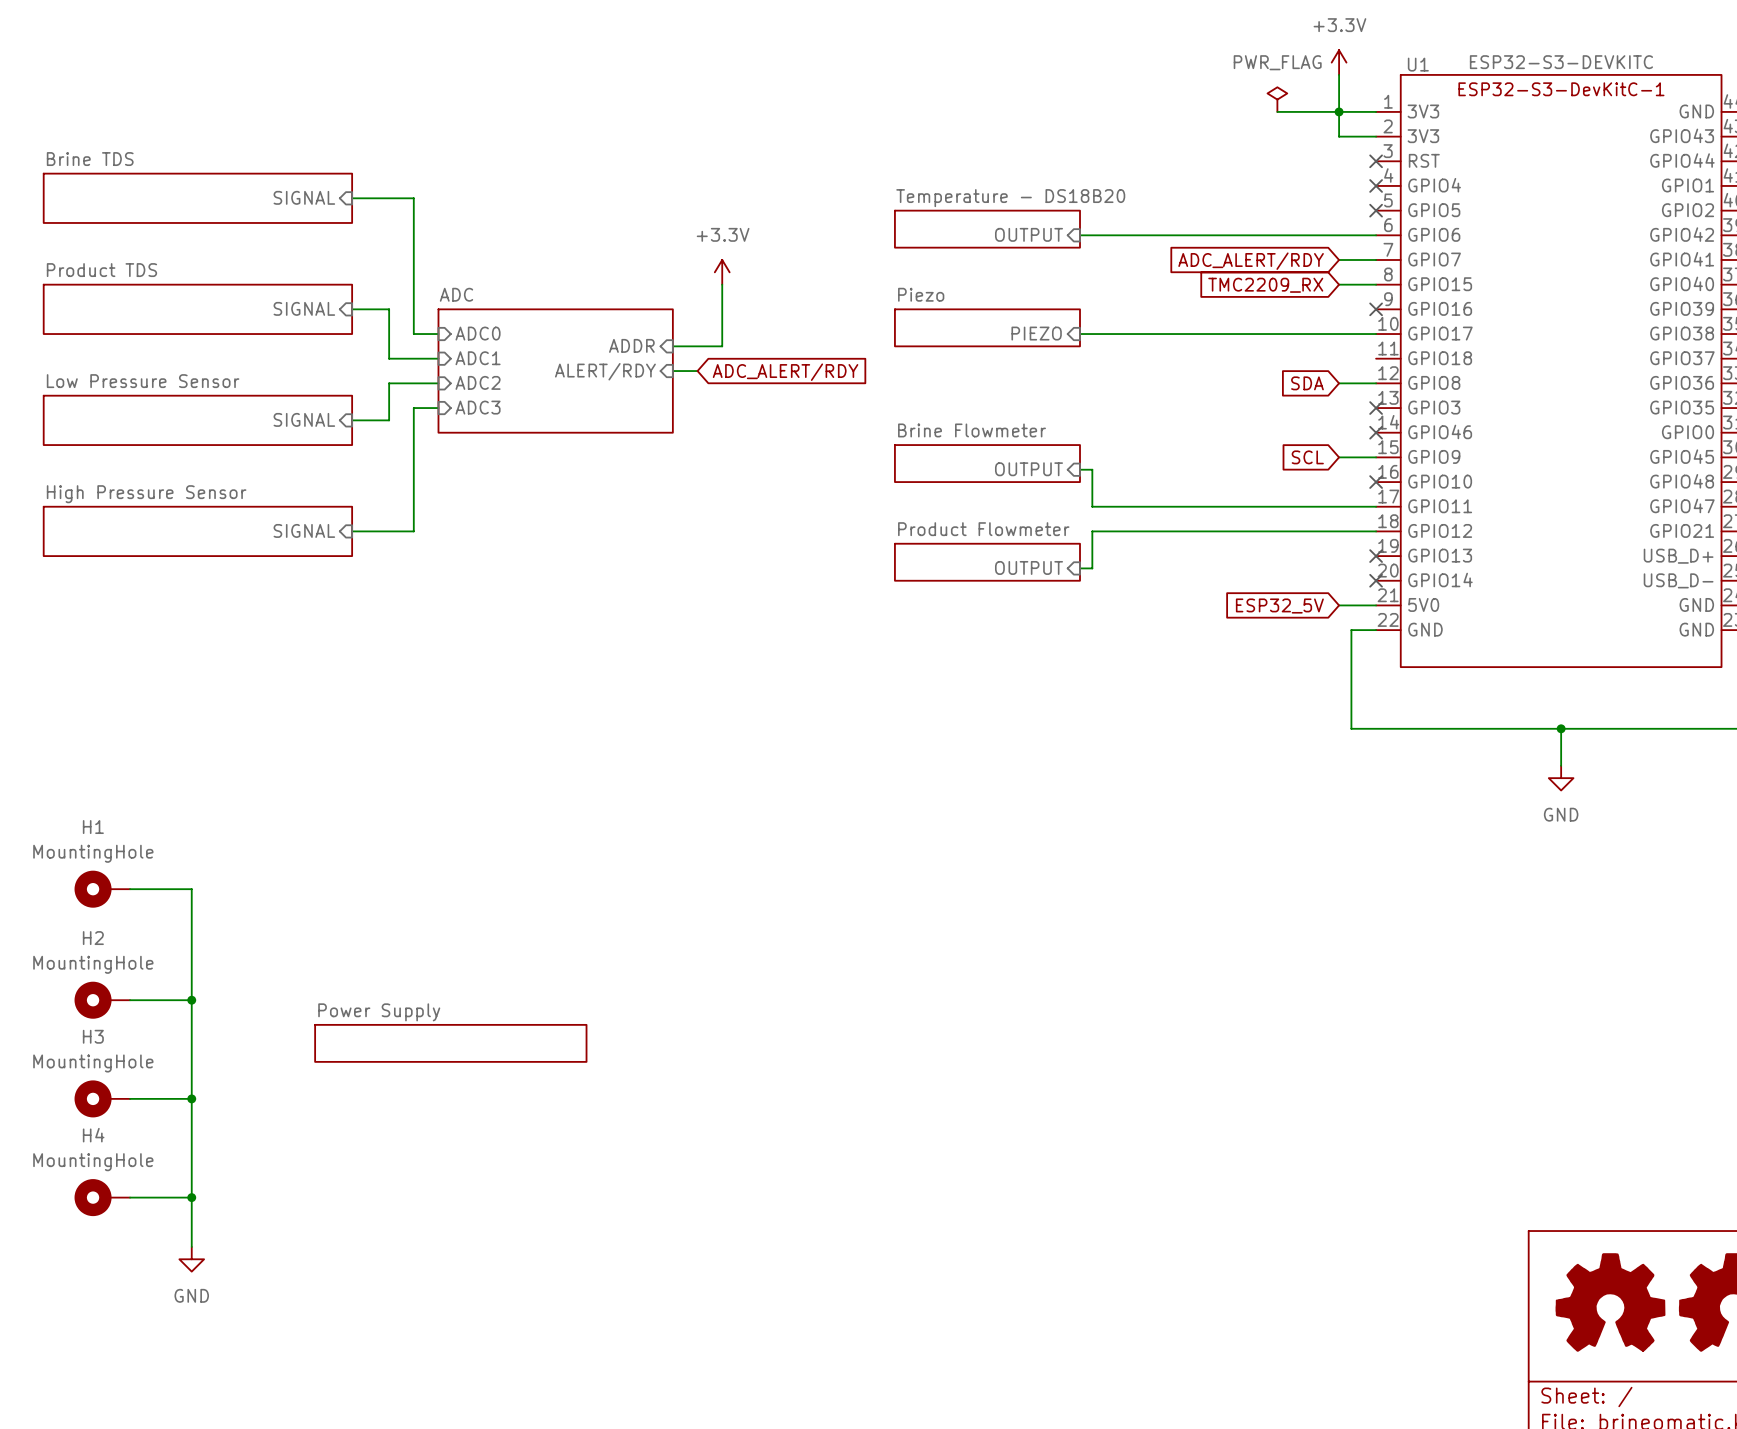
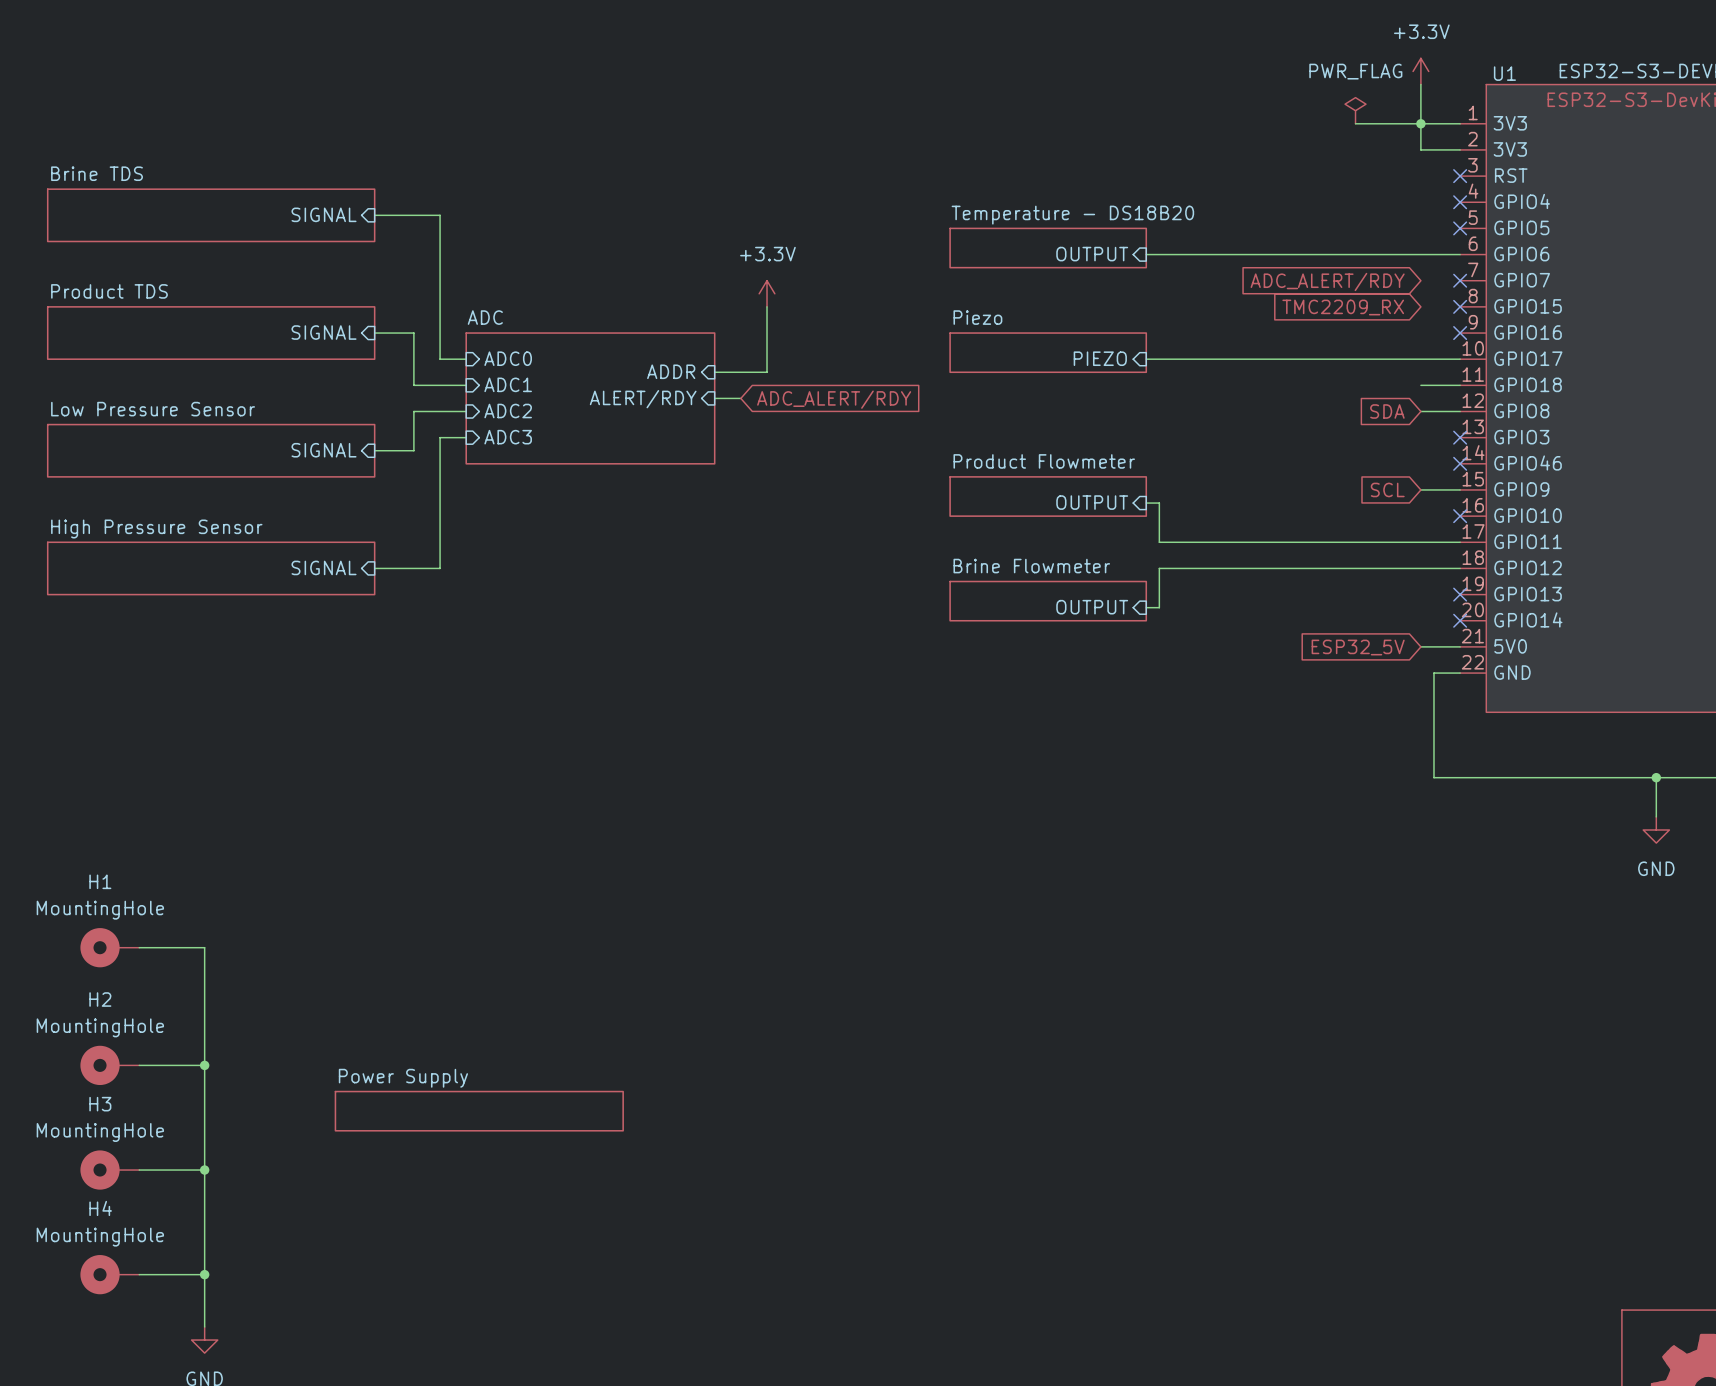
wire: (1339, 259) (1376, 259) -> none
no-connect mark: none -> (1460, 280)
wire: (1339, 284) (1376, 284) -> (1420, 385) (1460, 385)
no-connect mark: none -> (1460, 306)
sheet Brine Flowmeter name: Brine Flowmeter (972, 430) -> Product Flowmeter (1044, 461)
sheet Product Flowmeter name: Product Flowmeter (983, 529) -> Brine Flowmeter (1031, 566)

